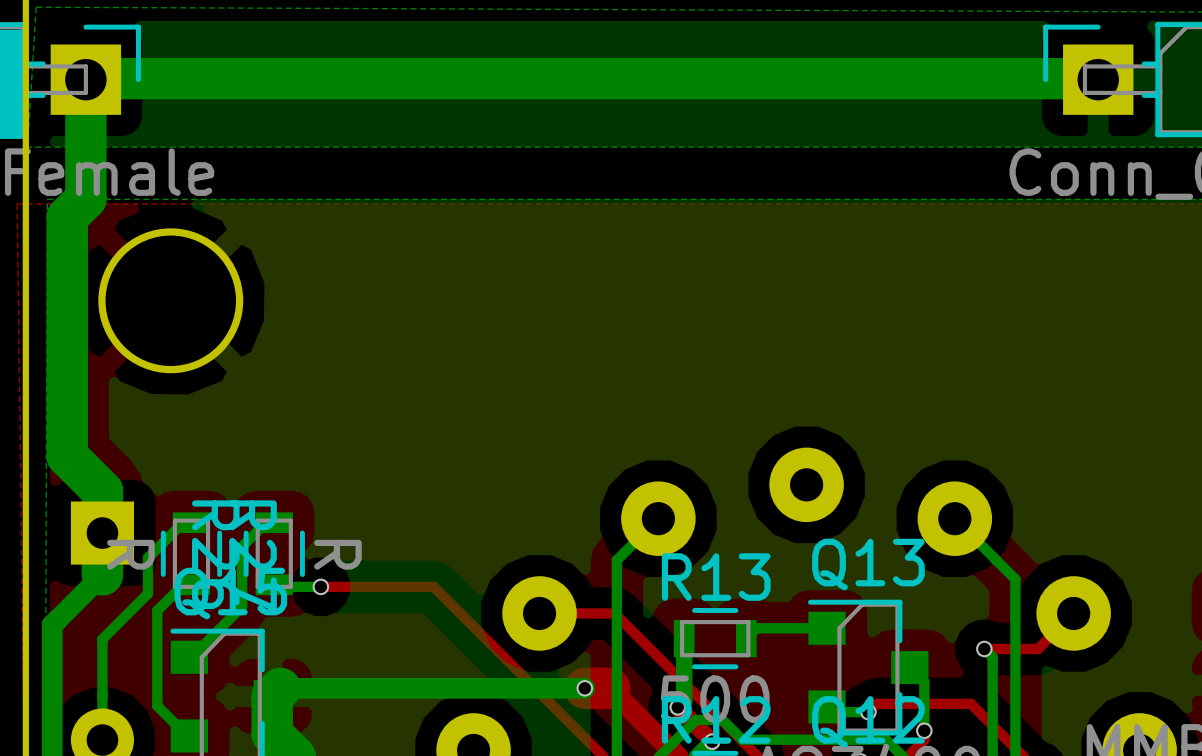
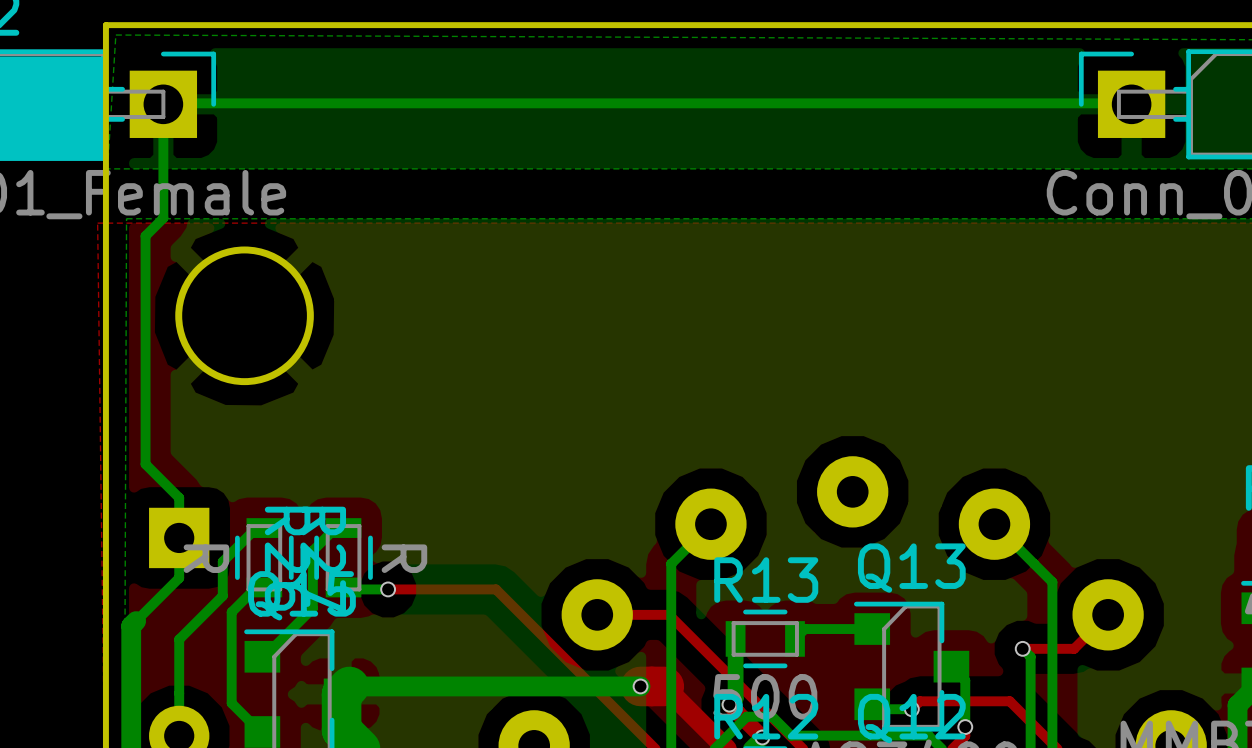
bottom track width: thick (1087, 78) (114, 78) (112, 76) (102, 86) -> thin (1121, 103) (191, 103) (189, 101) (179, 111)
bottom track width: thick (85, 79) (85, 198) (67, 217) (67, 455) (102, 491) (102, 574) (57, 619) -> thin (163, 104) (163, 218) (145, 236) (145, 464) (179, 497) (179, 578) (136, 621)

